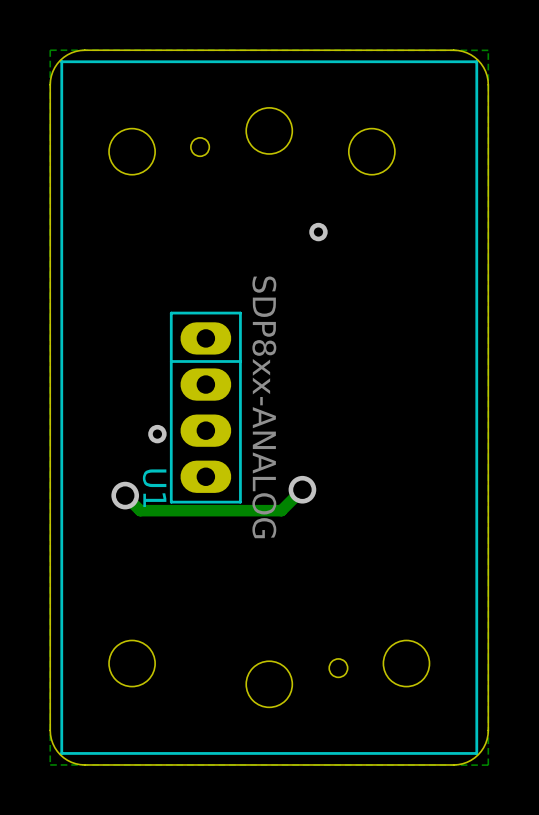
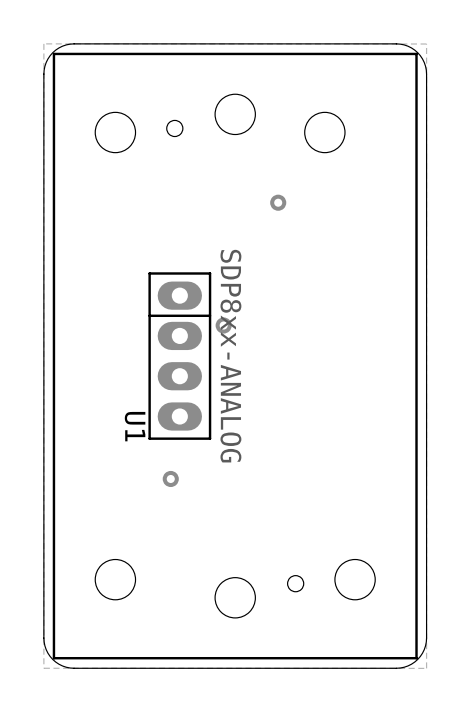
via: none -> (223, 325)
via: (157, 434) -> none
track: (302, 489) (281, 510) (140, 510) (125, 495) -> none
via: (302, 489) -> none
via: (125, 495) -> none
via: none -> (170, 478)

